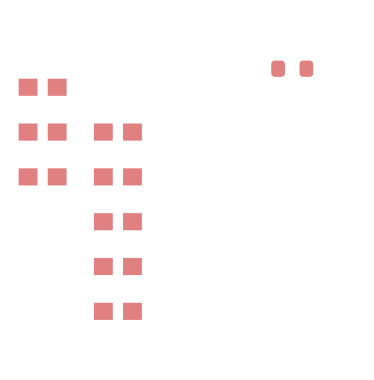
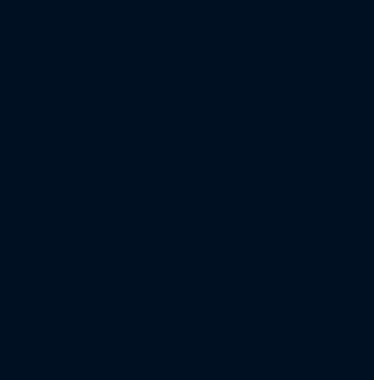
part: (292, 68) -> none
part: (42, 87) -> none
part: (42, 132) -> none
part: (117, 132) -> none
part: (42, 176) -> none
part: (117, 176) -> none
part: (117, 221) -> none
part: (117, 266) -> none
part: (117, 311) -> none

